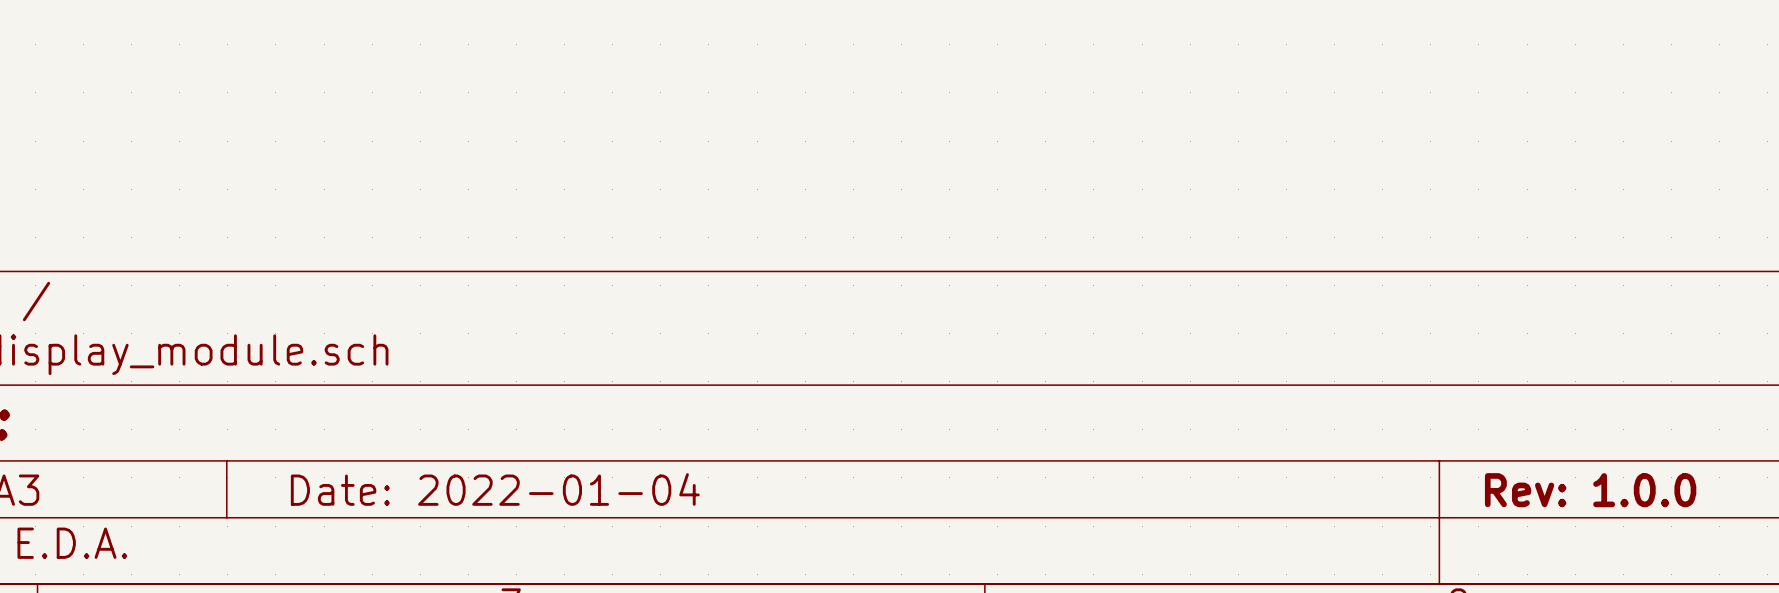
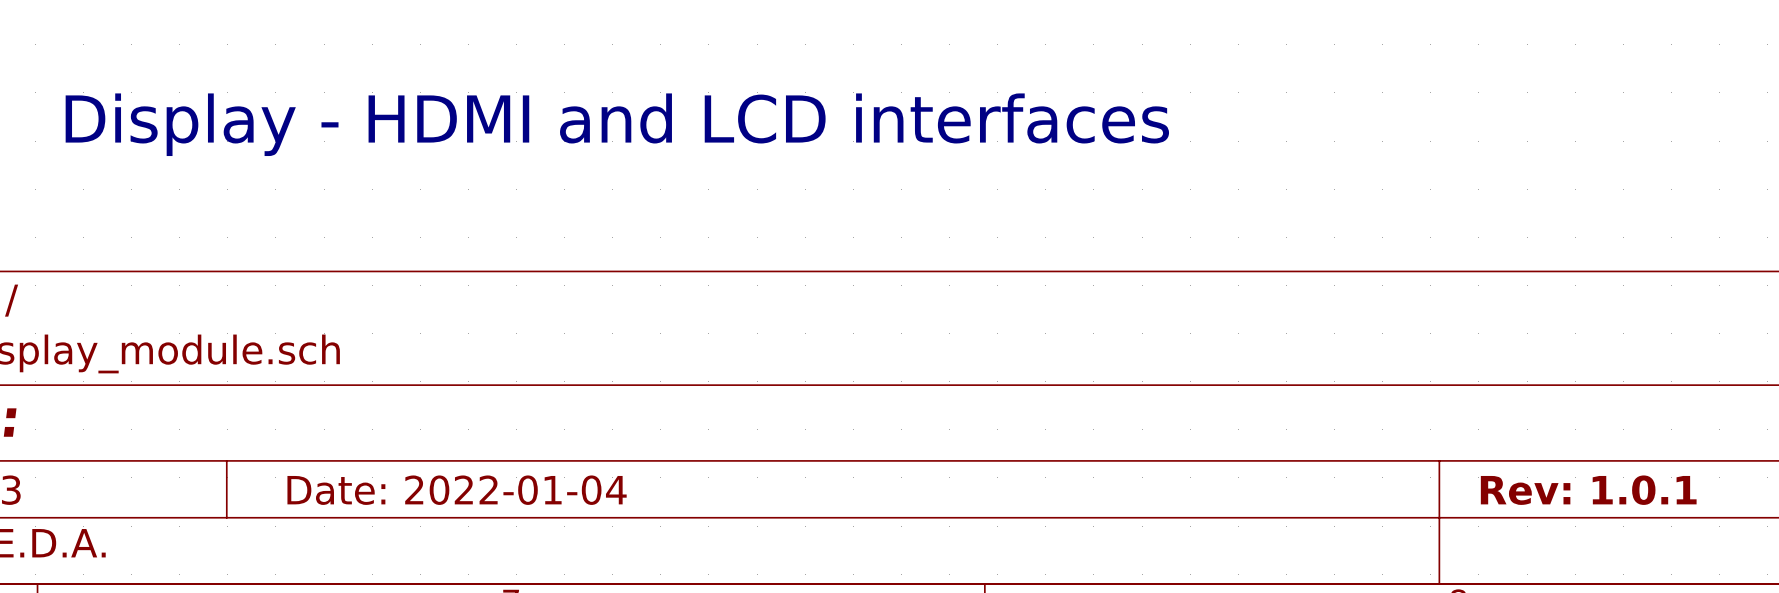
text: none -> Display - HDMI and LCD interfaces (617, 124)
title block: Rev: 1.0.0 (1590, 490) -> Rev: 1.0.1 (1588, 490)

